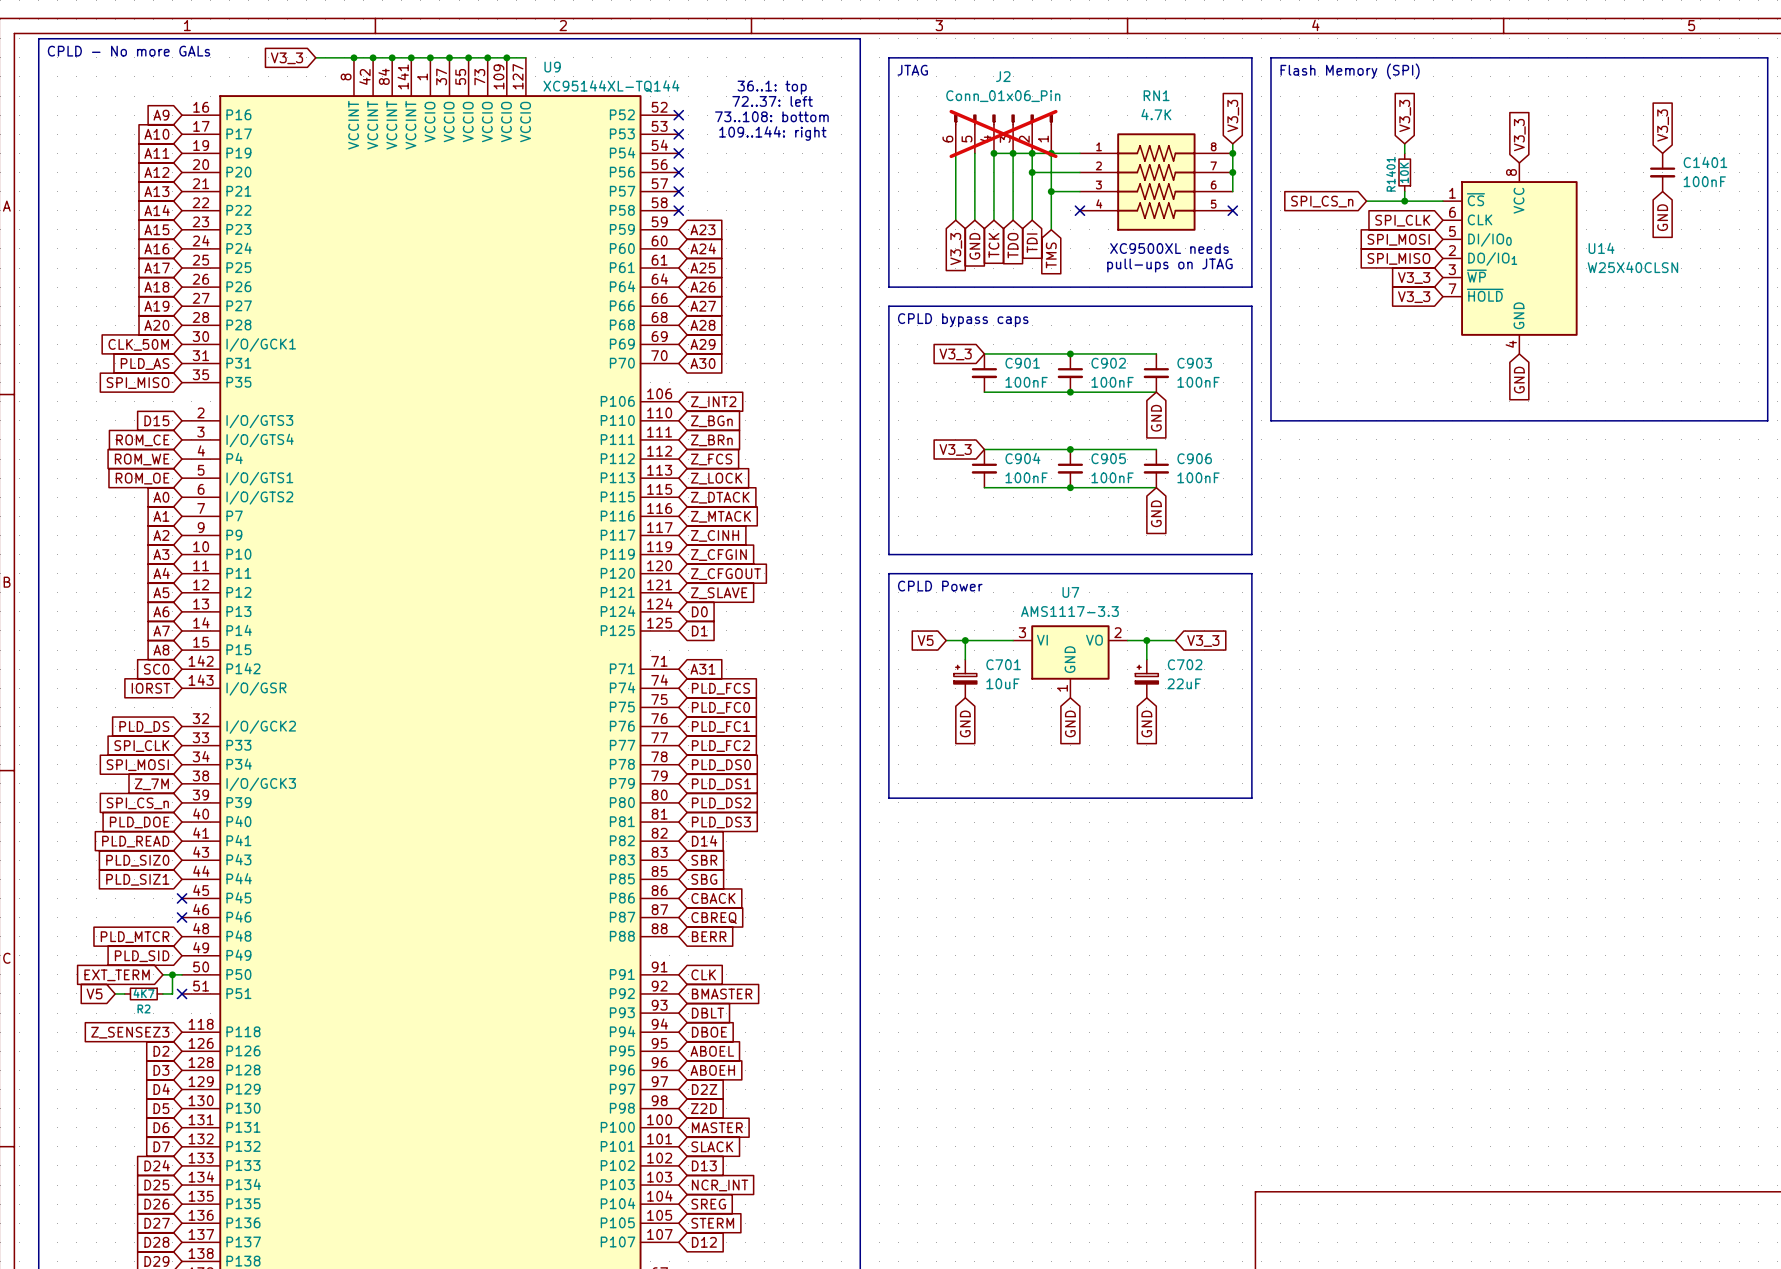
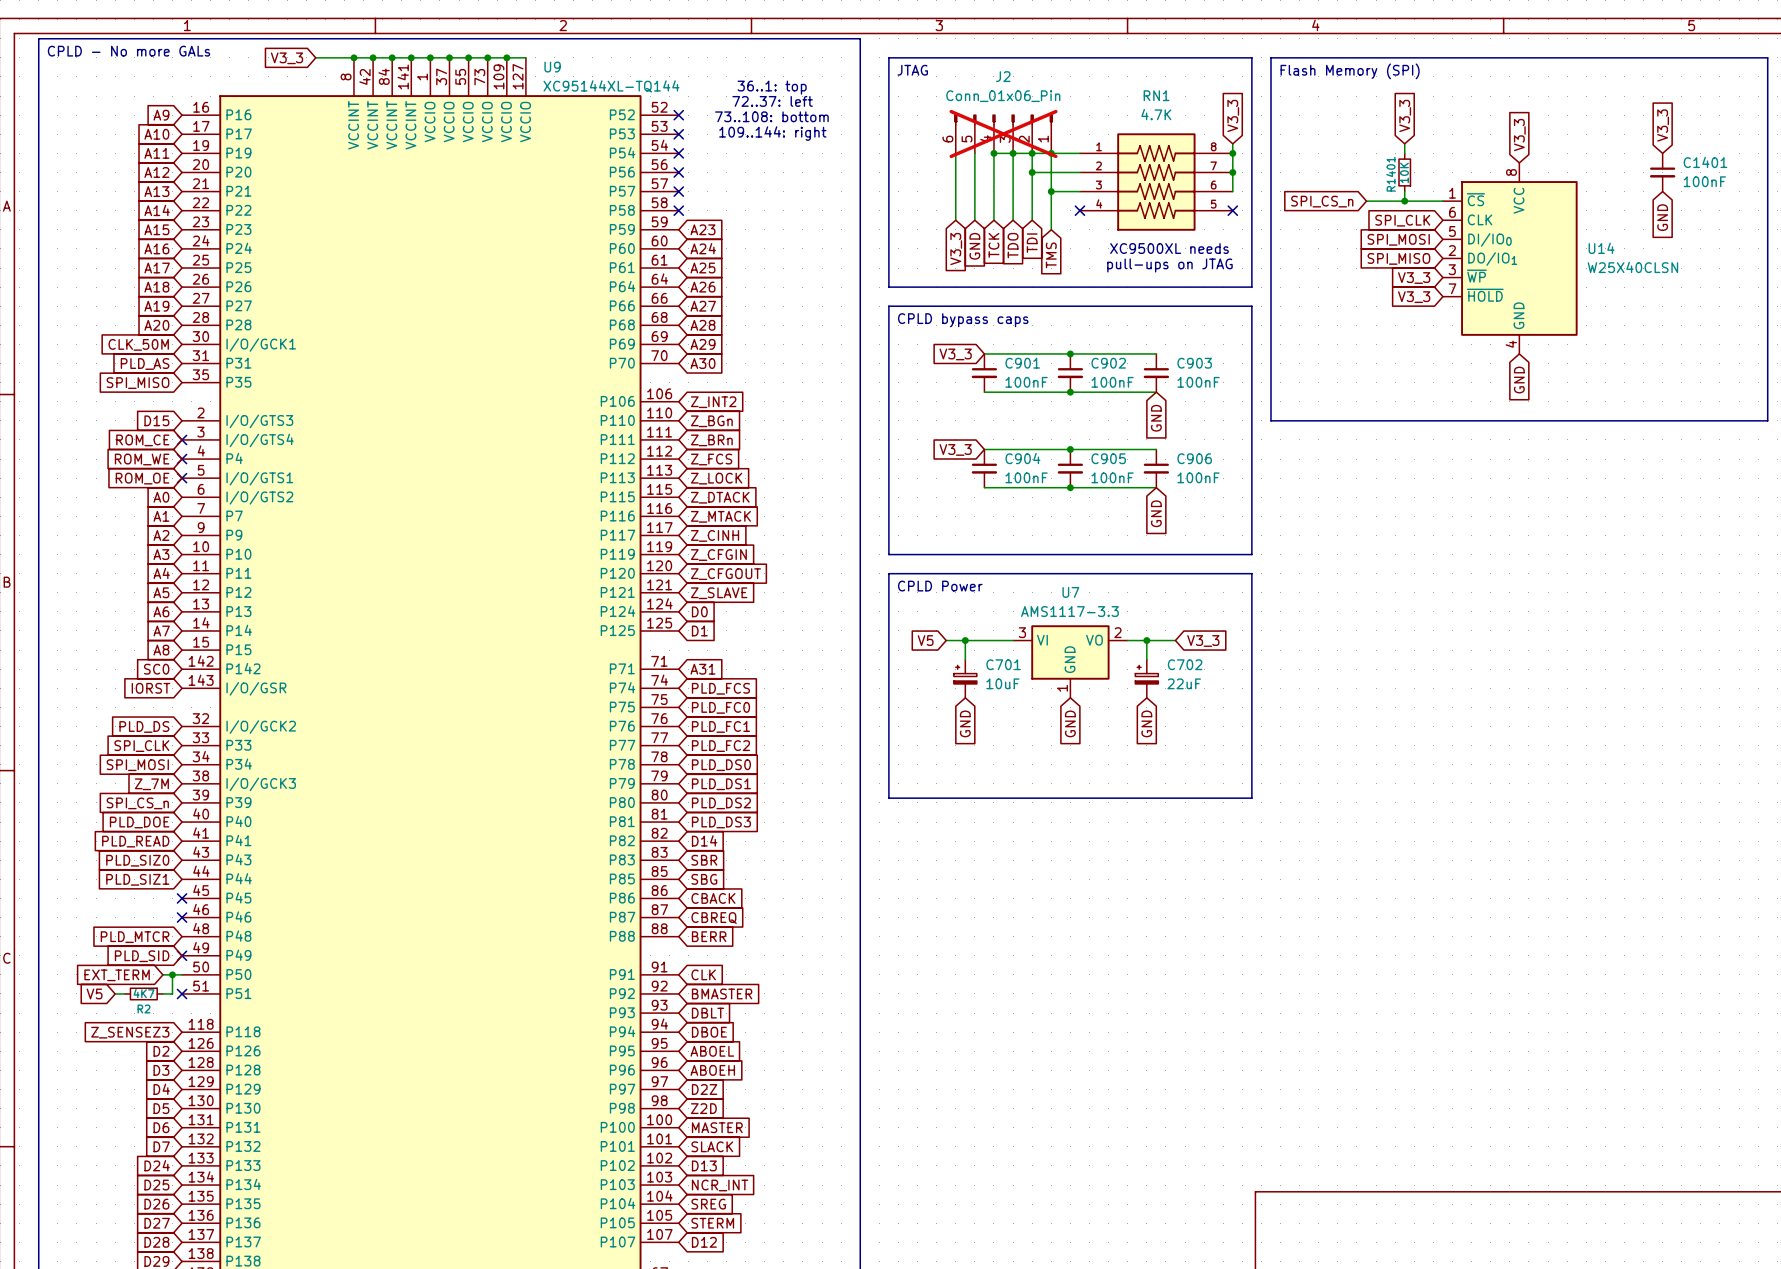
no-connect mark: none -> (182, 439)
no-connect mark: none -> (182, 459)
no-connect mark: none -> (182, 478)
no-connect mark: none -> (182, 955)

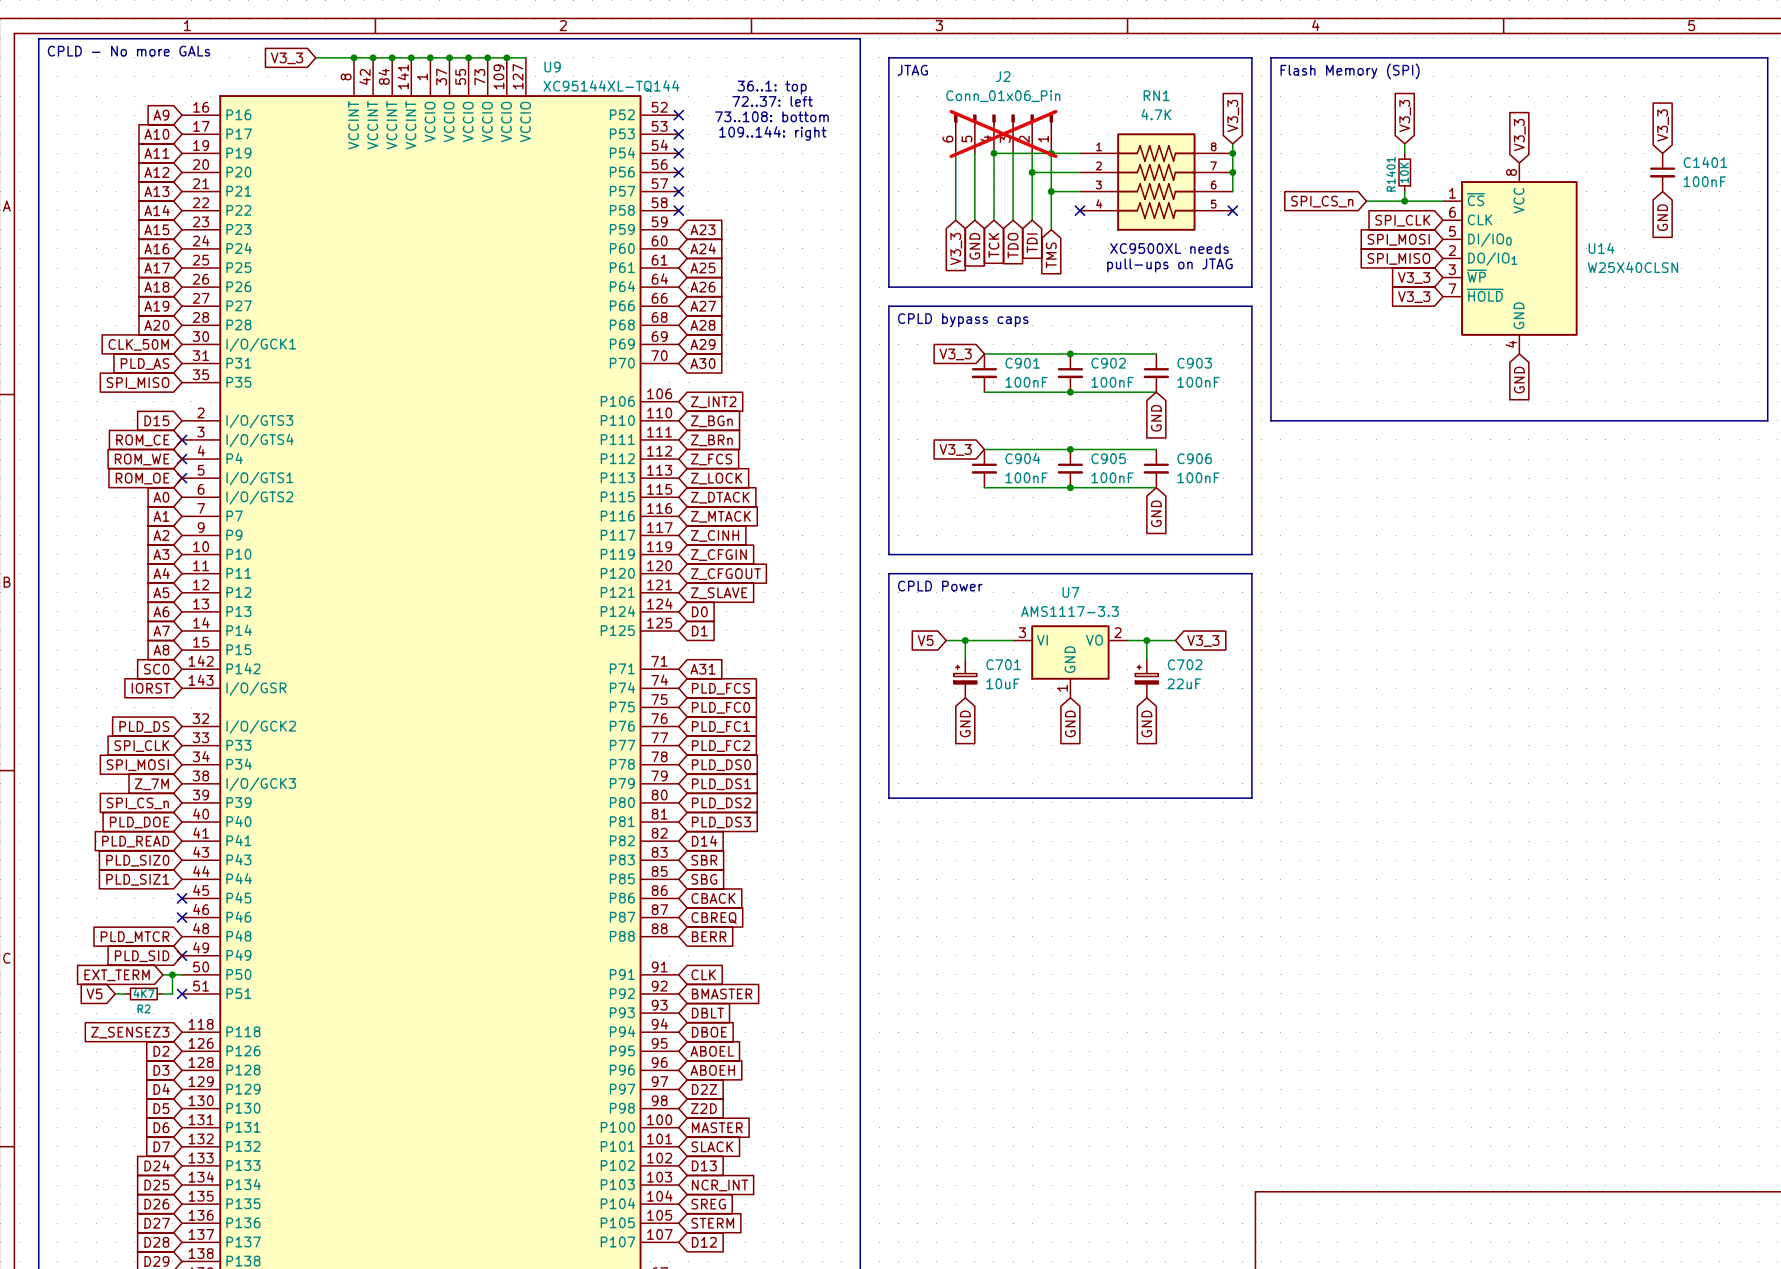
junction: (1013, 153) -> none
junction: (1032, 153) -> none

